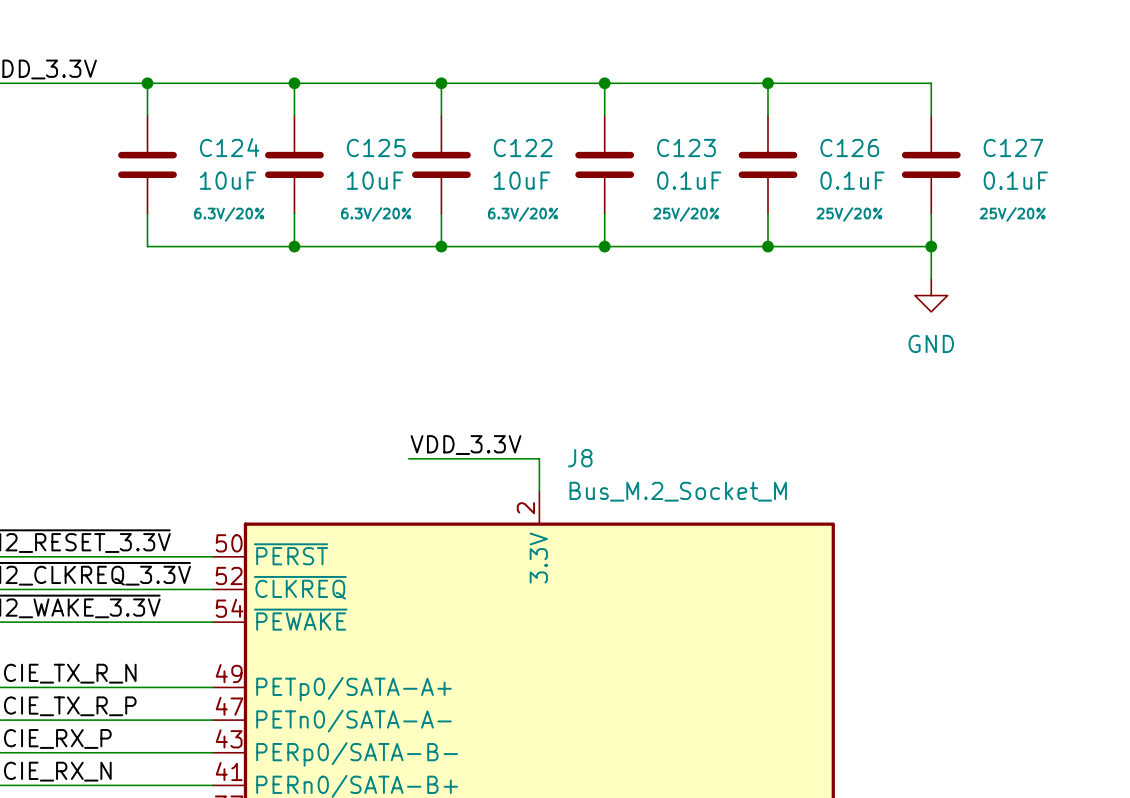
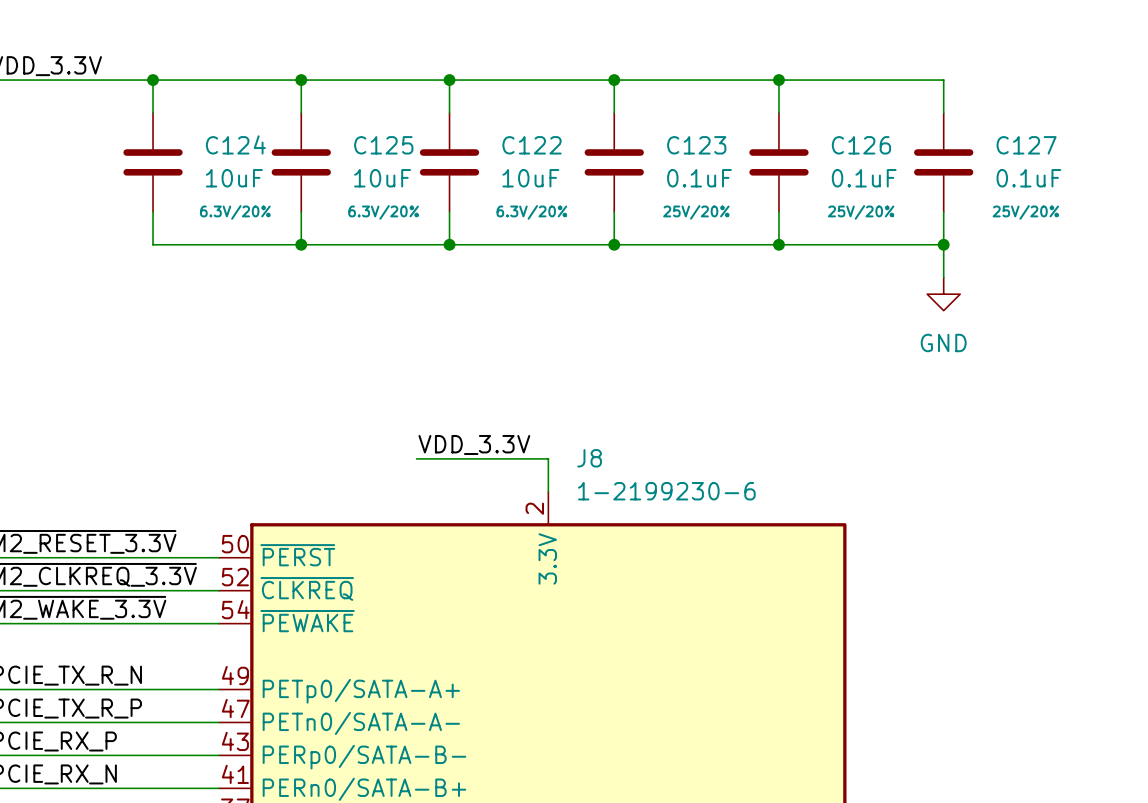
J8 value: Bus_M.2_Socket_M (678, 491) -> 1-2199230-6 (666, 491)

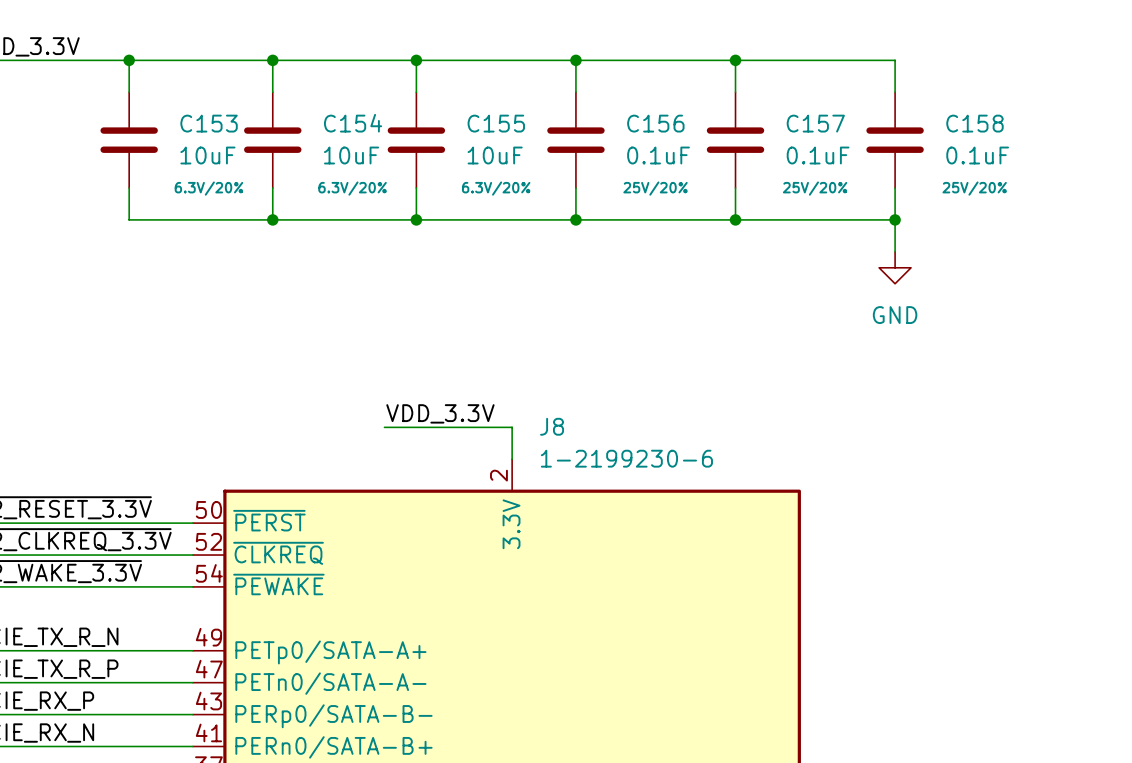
C124 name: C124 (235, 144) -> C153 (209, 123)
C125 name: C125 (383, 145) -> C154 (353, 123)
C122 name: C122 (532, 145) -> C155 (496, 123)
C123 name: C123 (696, 145) -> C156 (655, 123)
C126 name: C126 (861, 145) -> C157 (815, 123)
C127 name: C127 (1026, 145) -> C158 (974, 123)

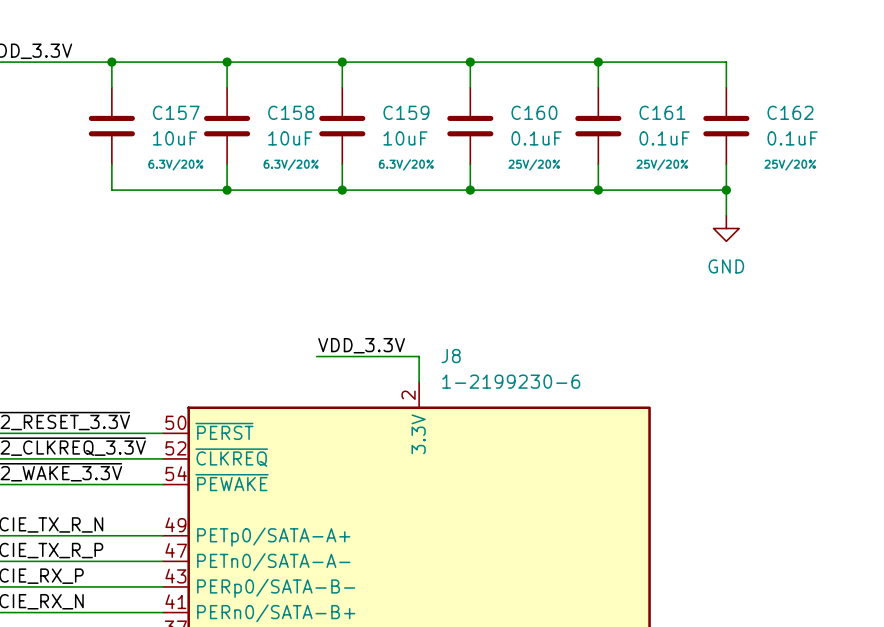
C153 name: C153 (209, 123) -> C157 (176, 112)
C154 name: C154 (353, 123) -> C158 (291, 112)
C155 name: C155 (496, 123) -> C159 (406, 112)
C156 name: C156 (655, 123) -> C160 (534, 112)
C157 name: C157 (815, 123) -> C161 (662, 112)
C158 name: C158 (974, 123) -> C162 (790, 112)

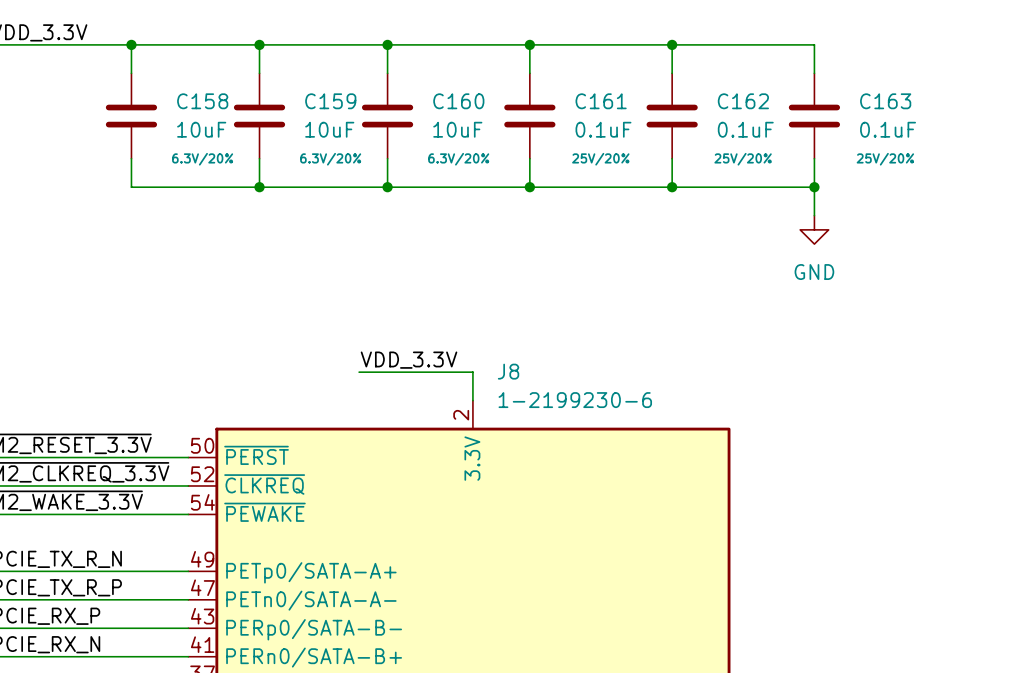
C157 name: C157 (176, 112) -> C158 (202, 101)
C158 name: C158 (291, 112) -> C159 (330, 101)
C159 name: C159 (406, 112) -> C160 (458, 101)
C160 name: C160 (534, 112) -> C161 (601, 101)
C161 name: C161 (662, 112) -> C162 (743, 101)
C162 name: C162 (790, 112) -> C163 (885, 101)

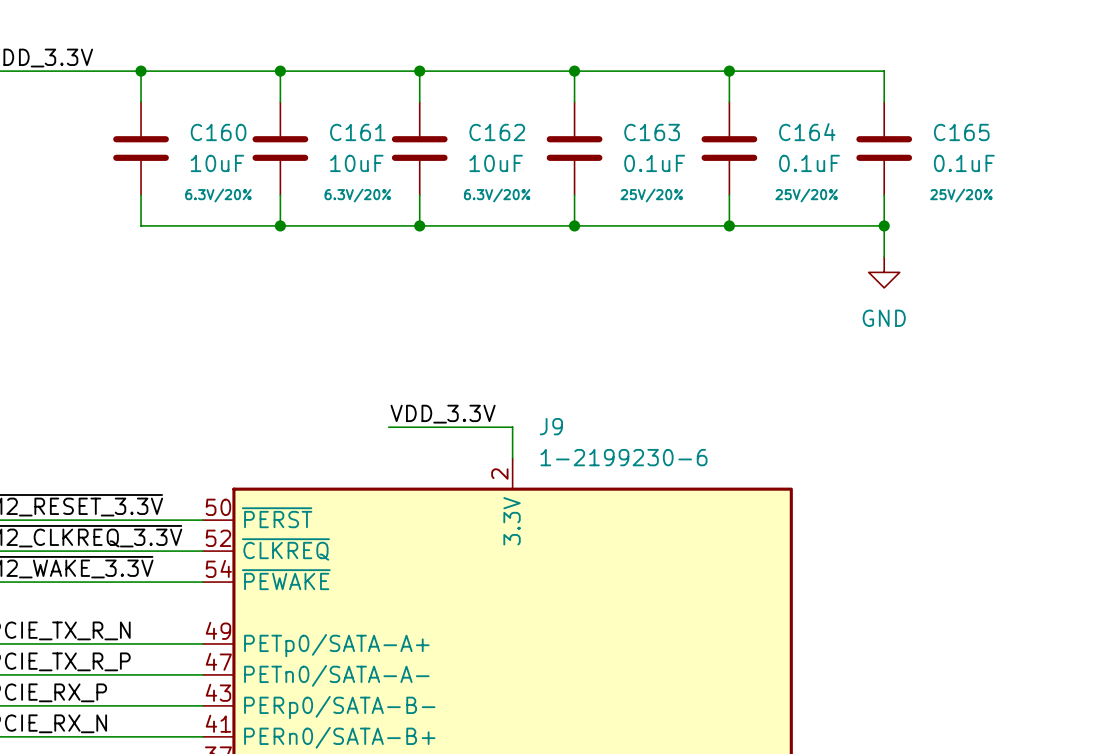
C158 name: C158 (202, 101) -> C160 (218, 132)
C159 name: C159 (330, 101) -> C161 (357, 132)
C160 name: C160 (458, 101) -> C162 (497, 132)
C161 name: C161 (601, 101) -> C163 (652, 132)
C162 name: C162 (743, 101) -> C164 (807, 132)
C163 name: C163 (885, 101) -> C165 (961, 132)
J8 name: J8 (508, 371) -> J9 (551, 426)

